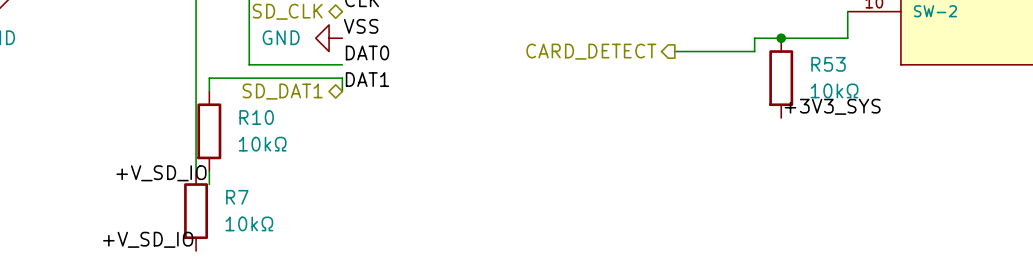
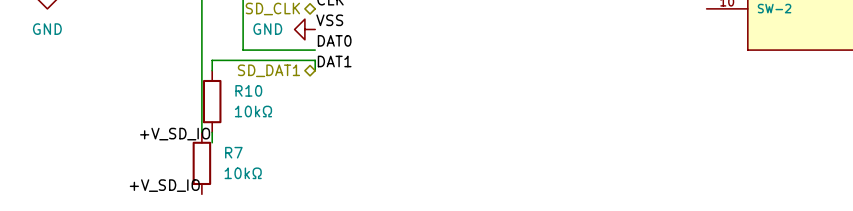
wire: (847, 11) (847, 38) (754, 38) (754, 51) (674, 51) -> none
junction: (781, 38) -> none
hierarchical label: CARD_DETECT (591, 51) -> none
R53: 10kΩ (781, 78) -> none
label: +3V3_SYS (832, 106) -> none

